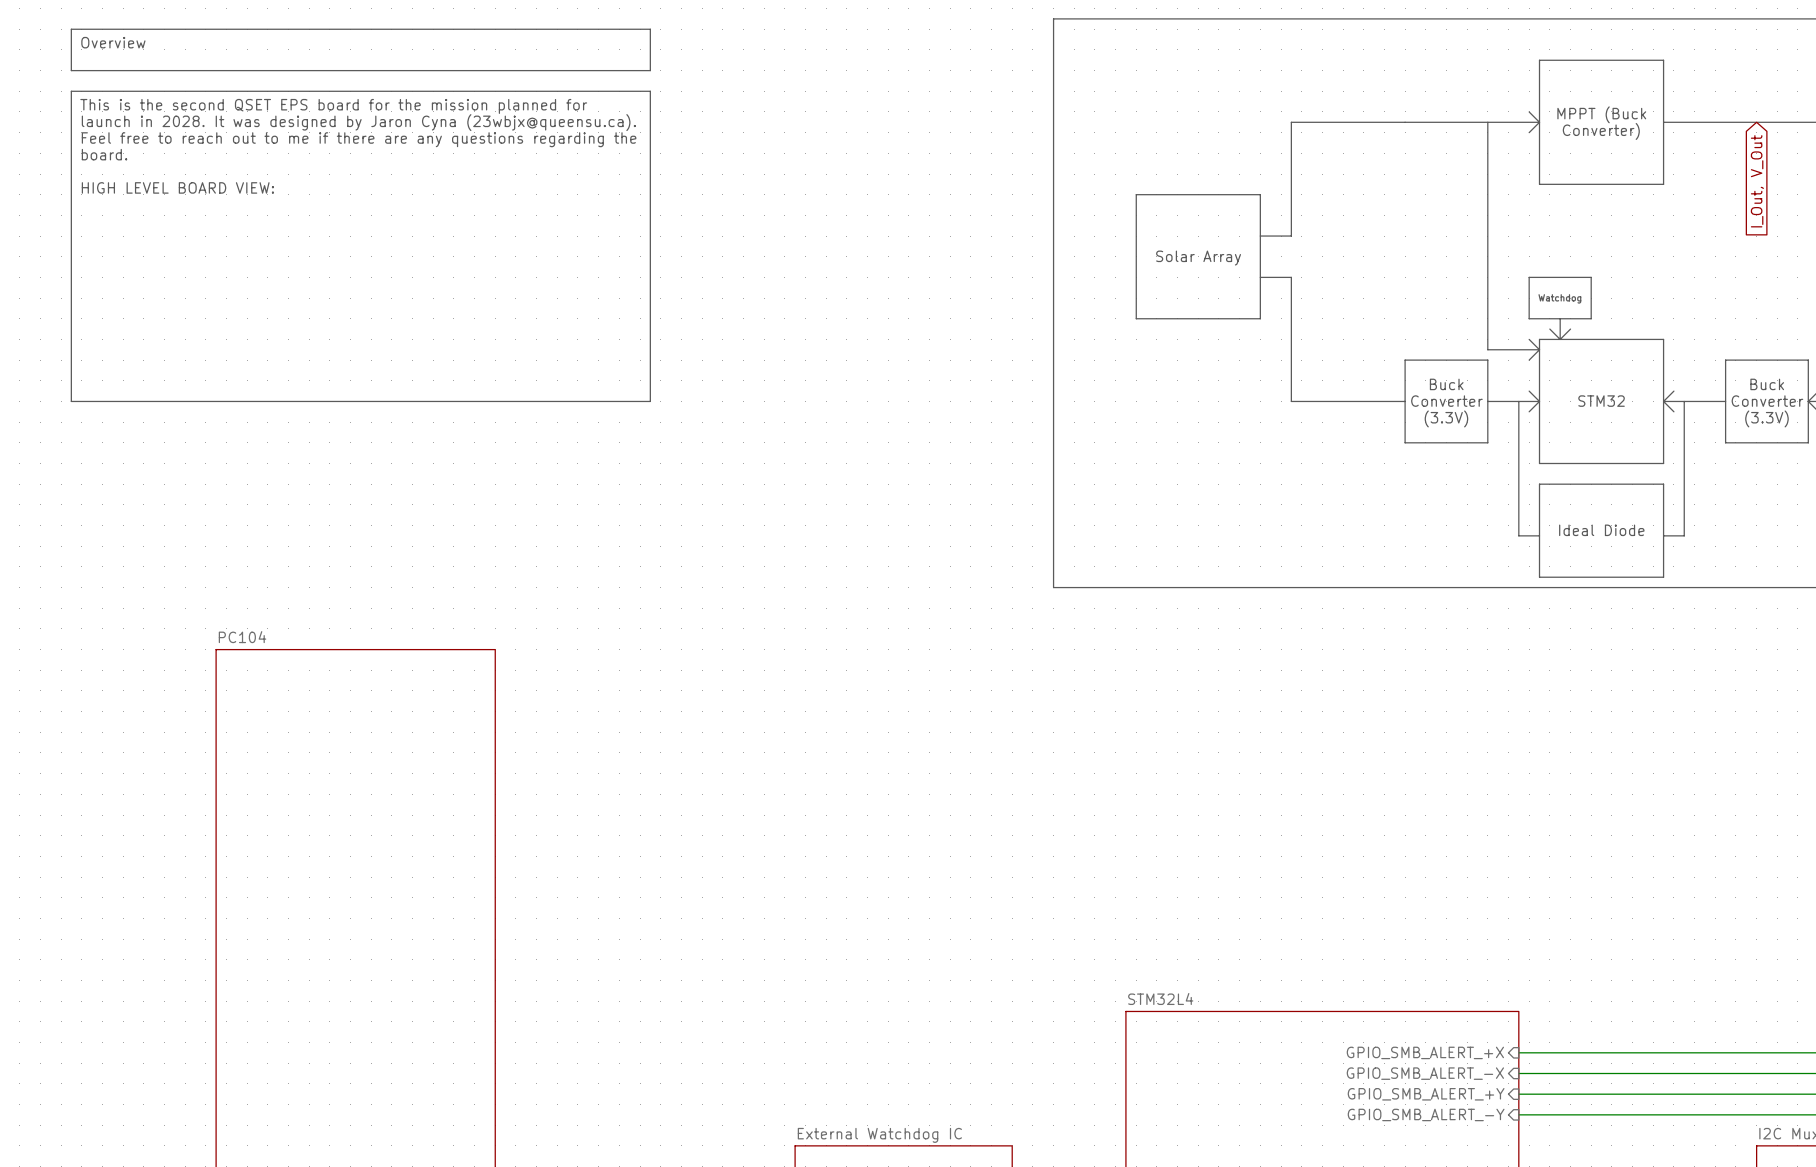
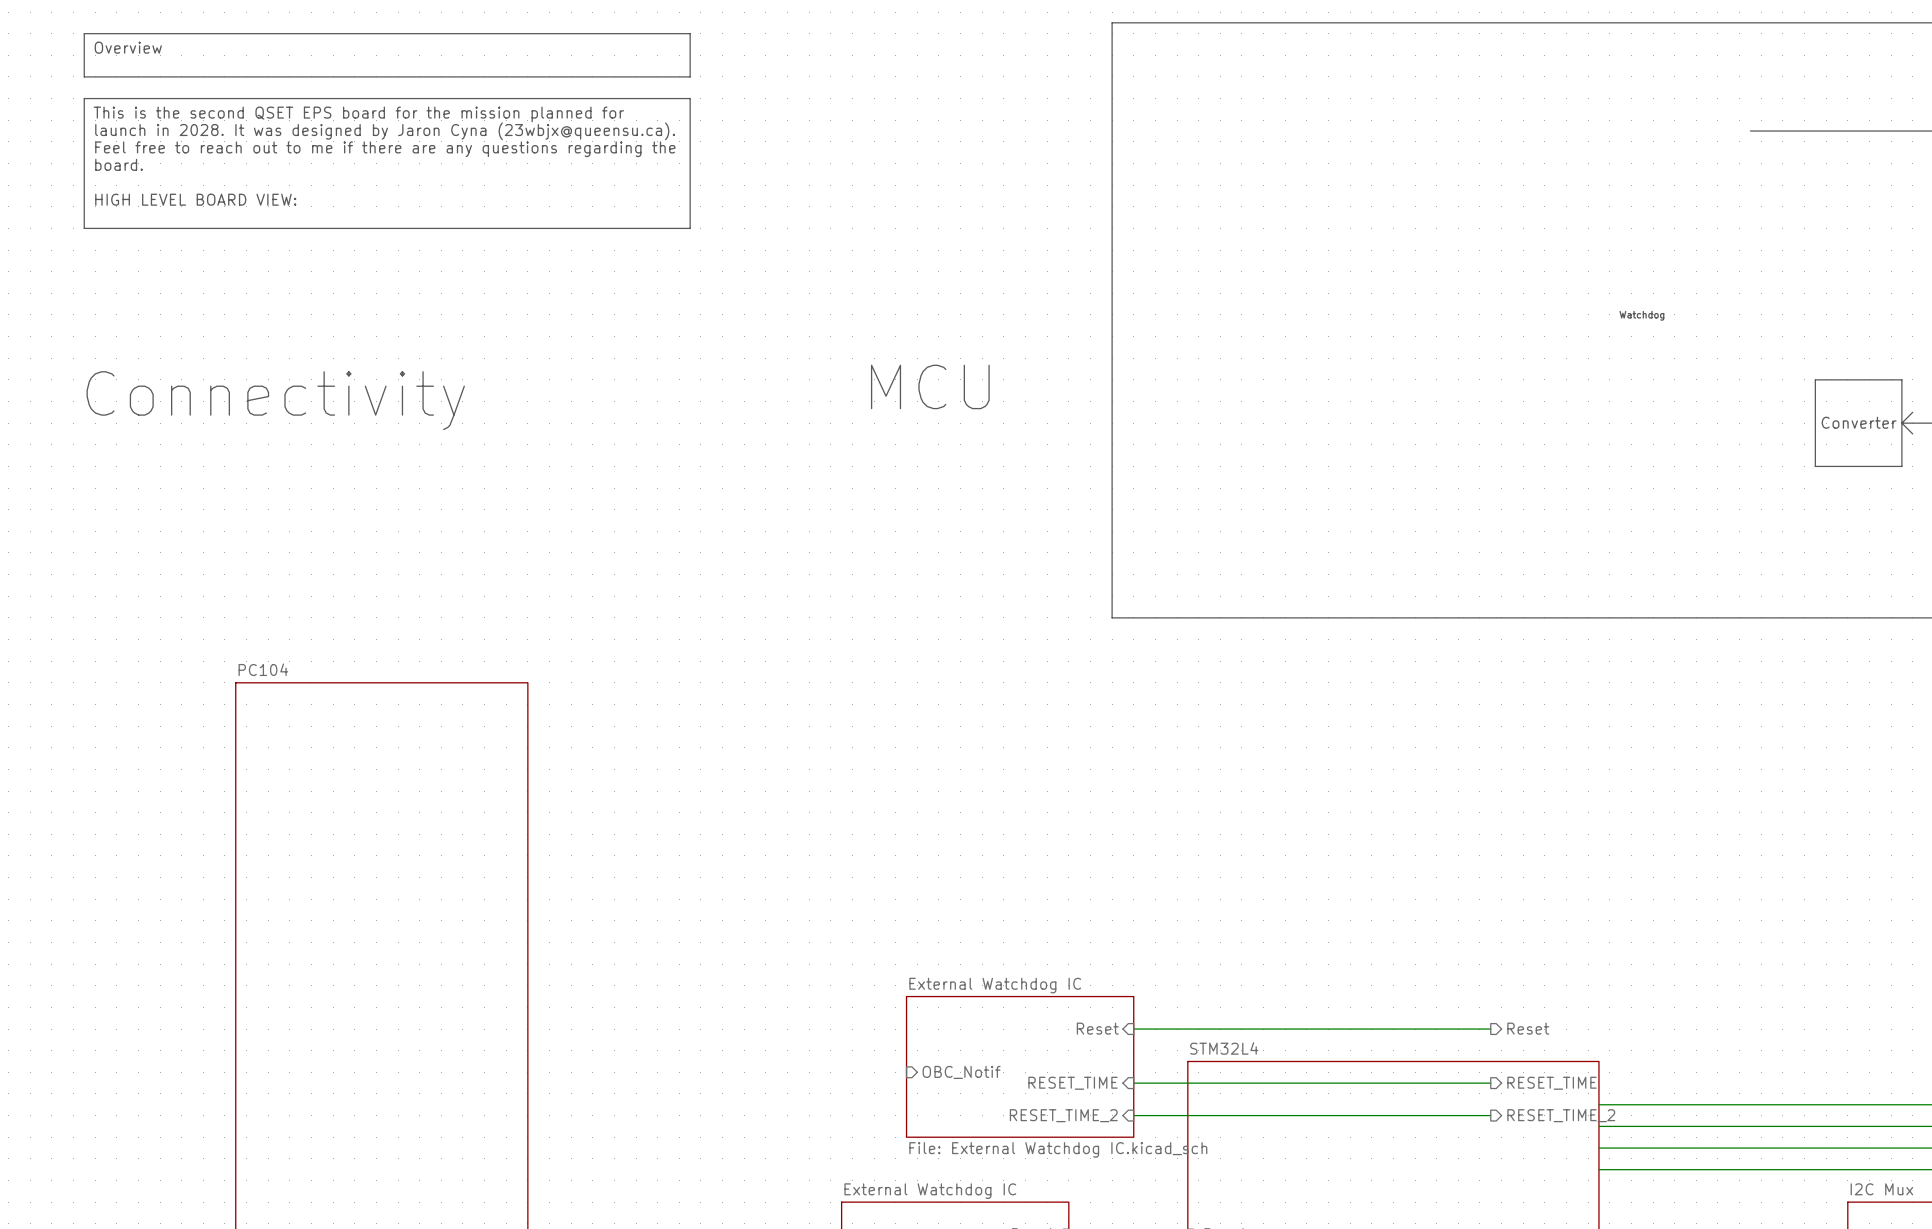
line: (1539, 60) (1539, 184) (1663, 184) (1663, 60) (1539, 60) -> none
line: (1529, 111) (1539, 122) -> none
text: MPPT (Buck (1601, 114) -> none
line: (1487, 122) (1487, 349) (1539, 349) -> none
line: (1539, 122) (1529, 132) -> none
line: (1539, 122) (1291, 122) (1291, 236) (1260, 236) -> none
text: Converter) (1601, 131) -> none
global label: I_Out, V_Out (1757, 181) -> none
line: (1136, 194) (1260, 194) (1260, 318) (1136, 318) (1136, 194) -> none
line: (71, 215) (71, 401) (650, 401) (650, 215) -> (84, 228) (690, 228)
text: Solar Array (1198, 258) -> none
line: (1260, 277) (1291, 277) (1291, 401) (1405, 401) -> none
line: (1529, 277) (1591, 277) (1591, 318) (1529, 318) (1529, 277) -> none
line: (1560, 318) (1560, 339) -> none
line: (1549, 329) (1560, 339) -> none
line: (1570, 329) (1560, 339) -> none
line: (1529, 339) (1539, 349) -> none
line: (1539, 339) (1663, 339) (1663, 463) (1539, 463) (1539, 339) -> none
line: (1539, 349) (1529, 360) -> none
line: (1405, 360) (1487, 360) (1487, 442) (1405, 442) (1405, 360) -> none
text: none -> MCU (930, 386)
text: none -> Connectivity (275, 400)
text: Buck (1446, 384) -> none
text: Buck (1767, 384) -> none
line: (1529, 391) (1539, 401) -> none
line: (1673, 391) (1663, 401) -> none
text: Converter (1446, 401) -> none
line: (1487, 401) (1539, 401) -> none
line: (1518, 401) (1518, 535) (1539, 535) -> none
line: (1539, 401) (1529, 411) -> none
text: STM32 (1601, 401) -> none
line: (1663, 401) (1725, 401) -> none
line: (1663, 401) (1673, 411) -> none
line: (1684, 401) (1684, 535) (1663, 535) -> none
text: (3.3V) (1446, 418) -> none
text: (3.3V) (1766, 418) -> none
line: (1539, 484) (1539, 577) (1663, 577) (1663, 484) (1539, 484) -> none
text: Ideal Diode (1601, 530) -> none
sheet pin: none -> Reset (1097, 1028)
wire: none -> (1133, 1029) (1490, 1029)
sheet pin: none -> Reset (1528, 1028)
sheet External Watchdog IC: none -> File: External Watchdog IC.kicad_sch (1020, 1066)
sheet pin: none -> OBC_Notif (961, 1072)
sheet pin: none -> RESET_TIME (1073, 1083)
wire: none -> (1133, 1083) (1490, 1083)
sheet pin: none -> RESET_TIME (1551, 1083)
sheet pin: GPIO_SMB_ALERT_+X (1425, 1052) -> none
sheet pin: none -> RESET_TIME_2 (1063, 1115)
wire: none -> (1133, 1115) (1490, 1115)
sheet pin: none -> RESET_TIME_2 (1561, 1115)
sheet pin: GPIO_SMB_ALERT_-X (1425, 1073) -> none
sheet pin: GPIO_SMB_ALERT_+Y (1426, 1094) -> none
sheet pin: GPIO_SMB_ALERT_-Y (1426, 1114) -> none

